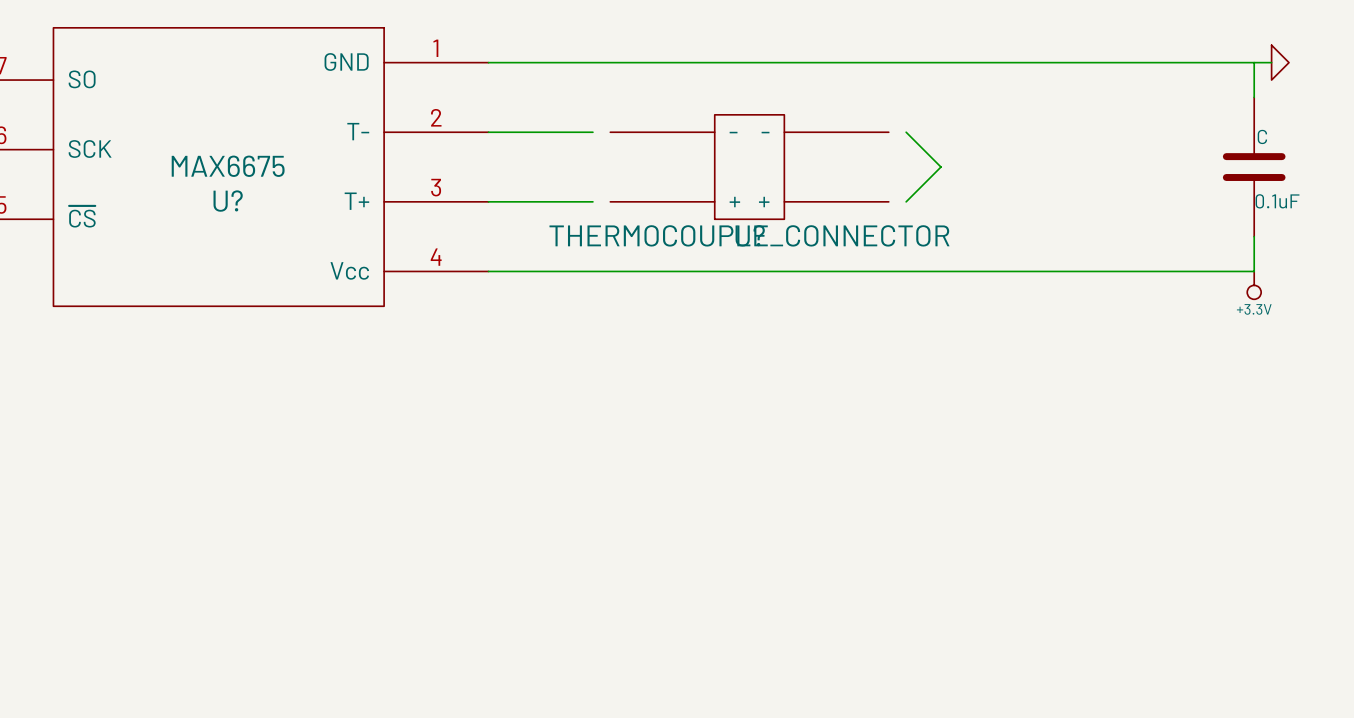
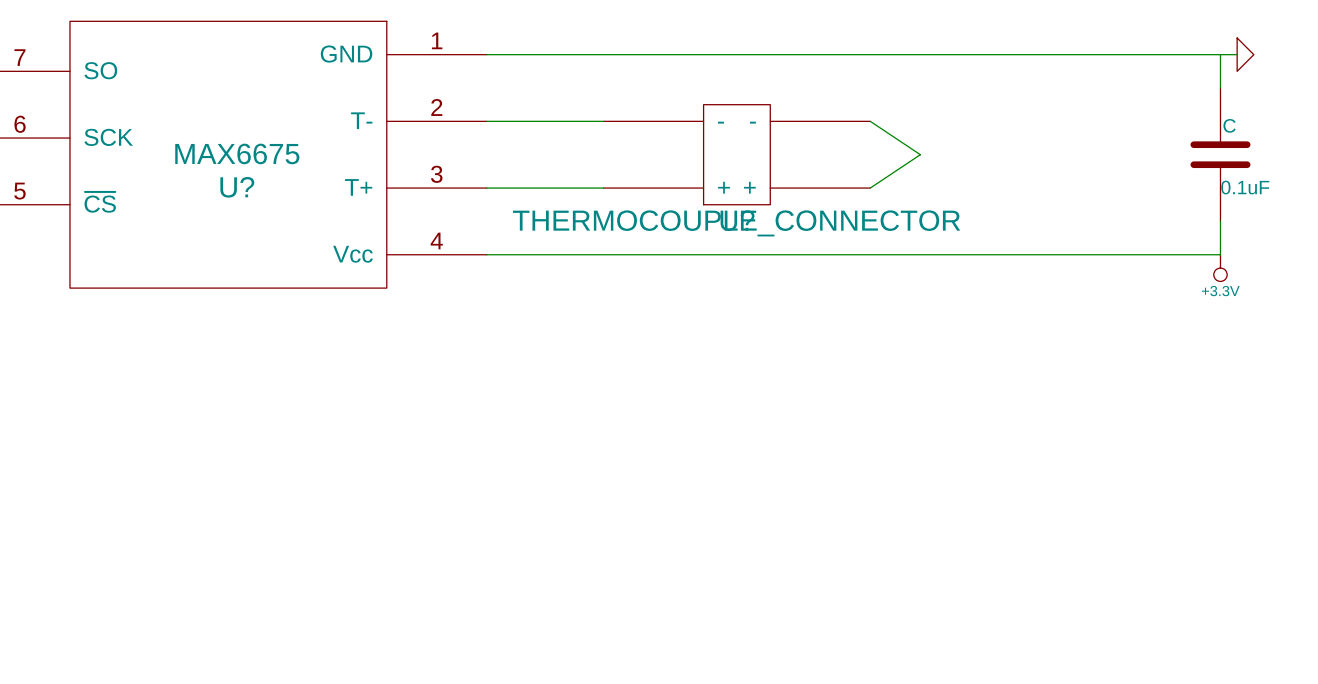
wire: none -> (586, 121) (603, 121)
wire: none -> (870, 121) (920, 154) (870, 188)
wire: (906, 132) (940, 167) (906, 201) -> none
wire: none -> (586, 188) (603, 188)

